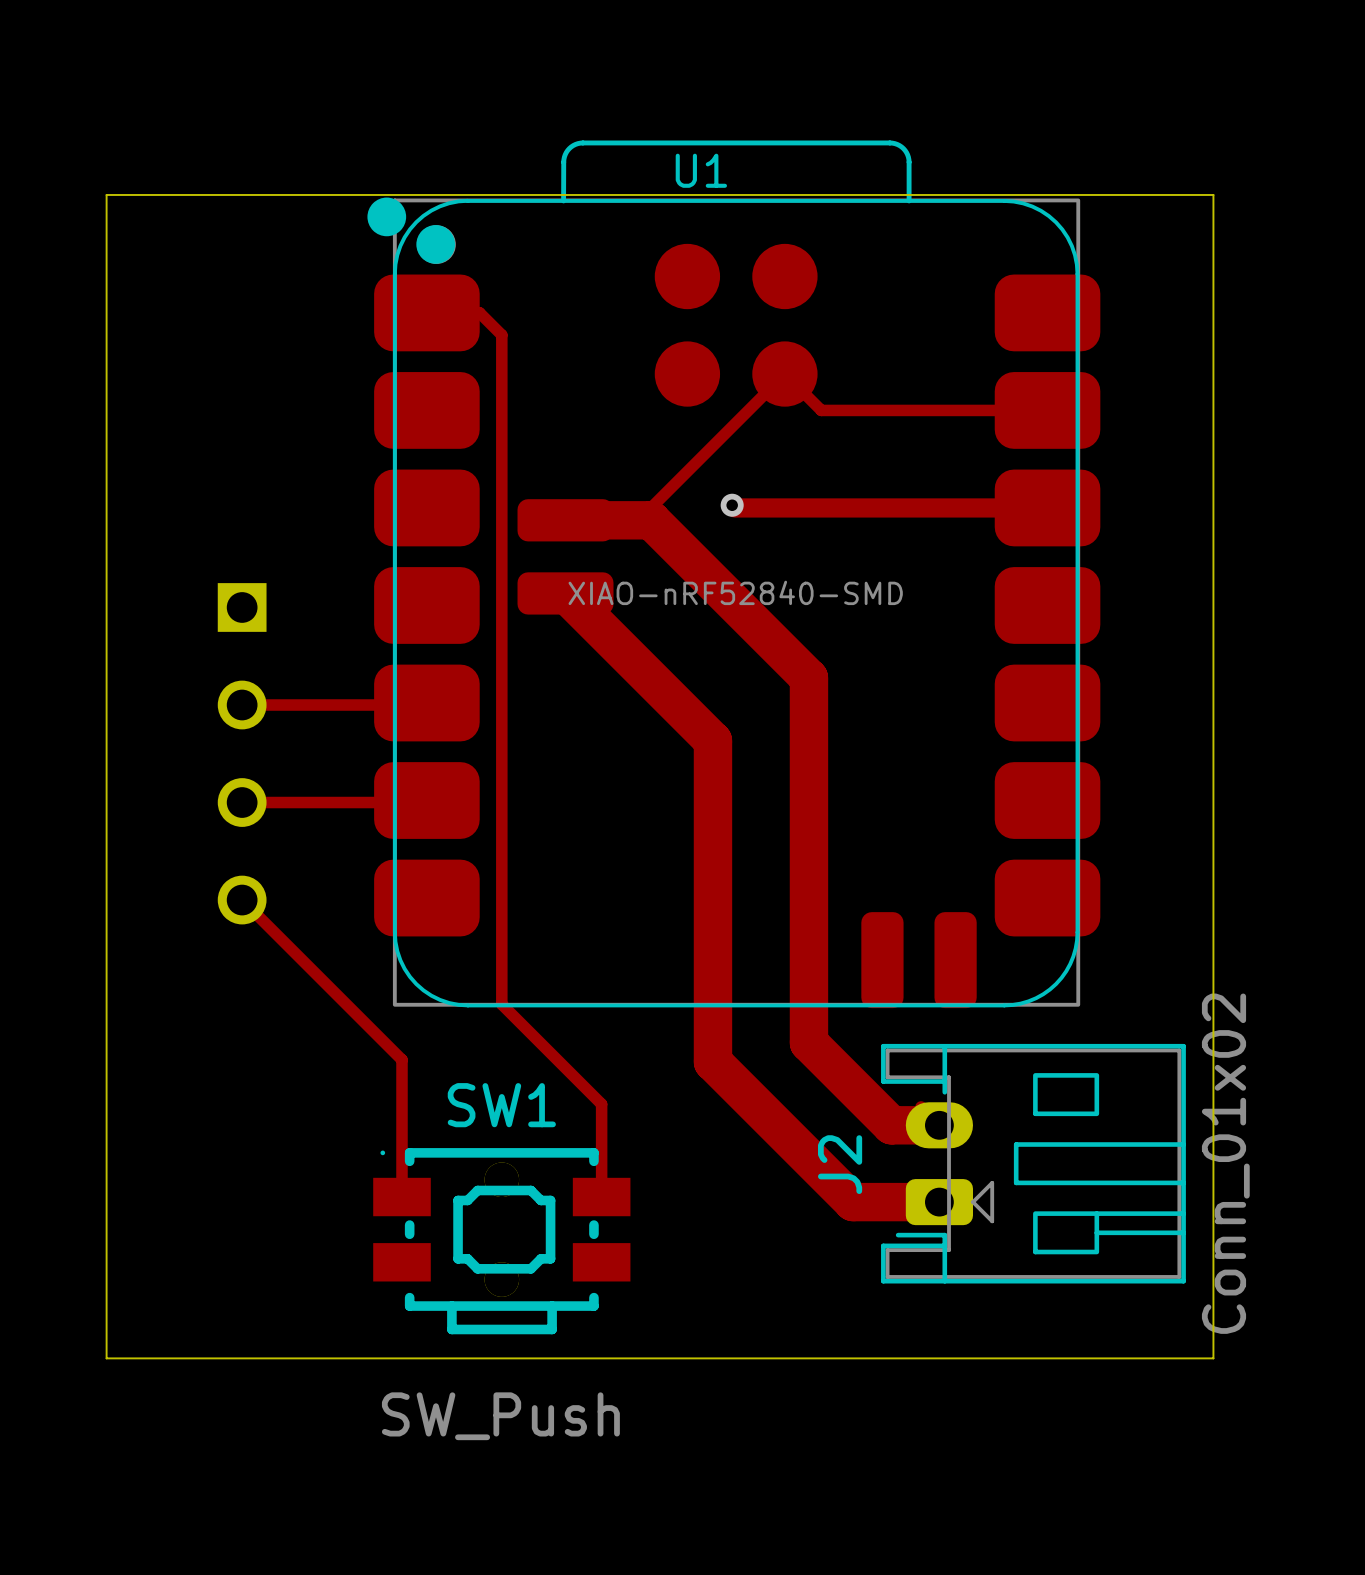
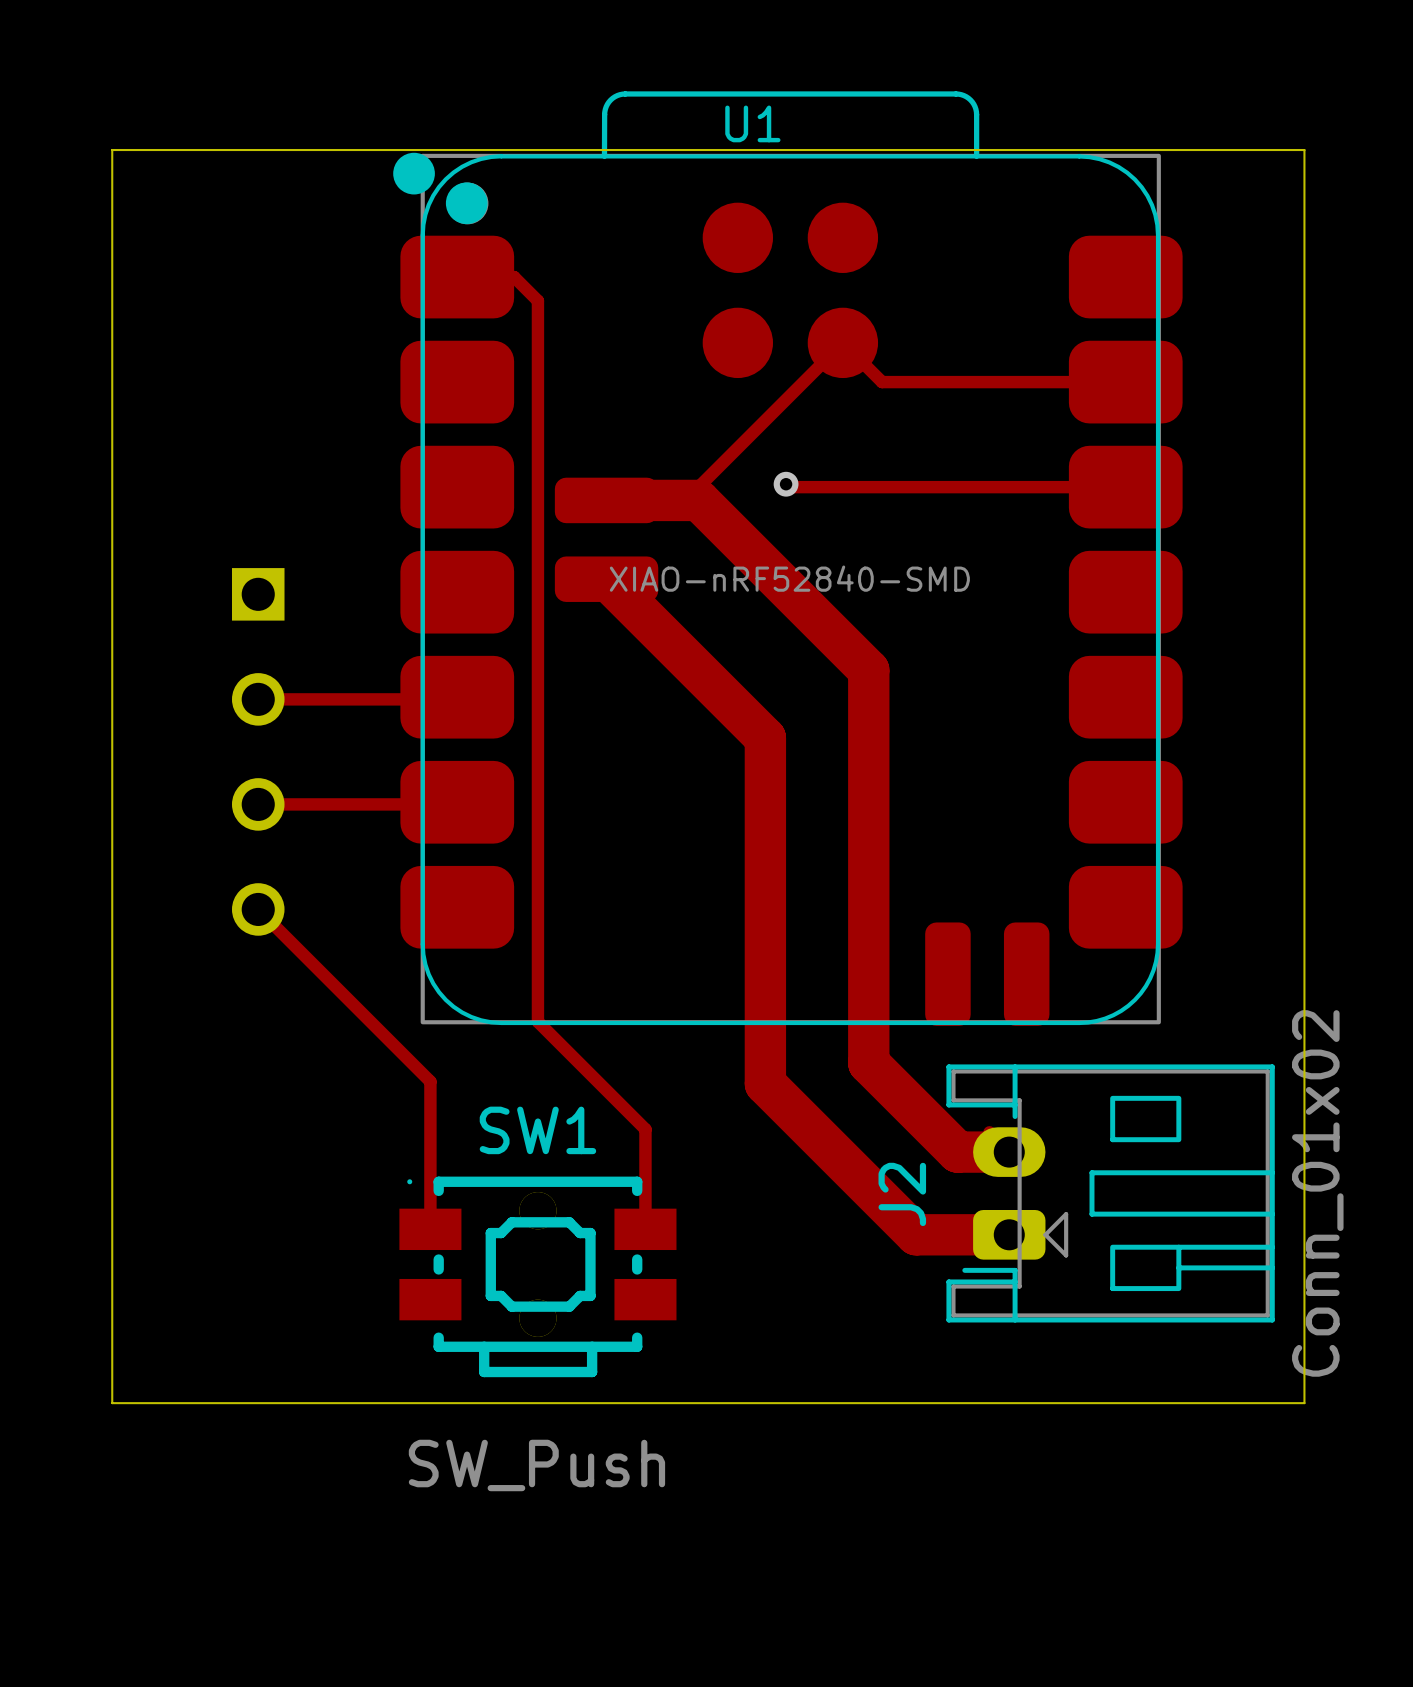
track width: thick (734, 507) (1047, 507) -> thin (788, 487) (1125, 487)

